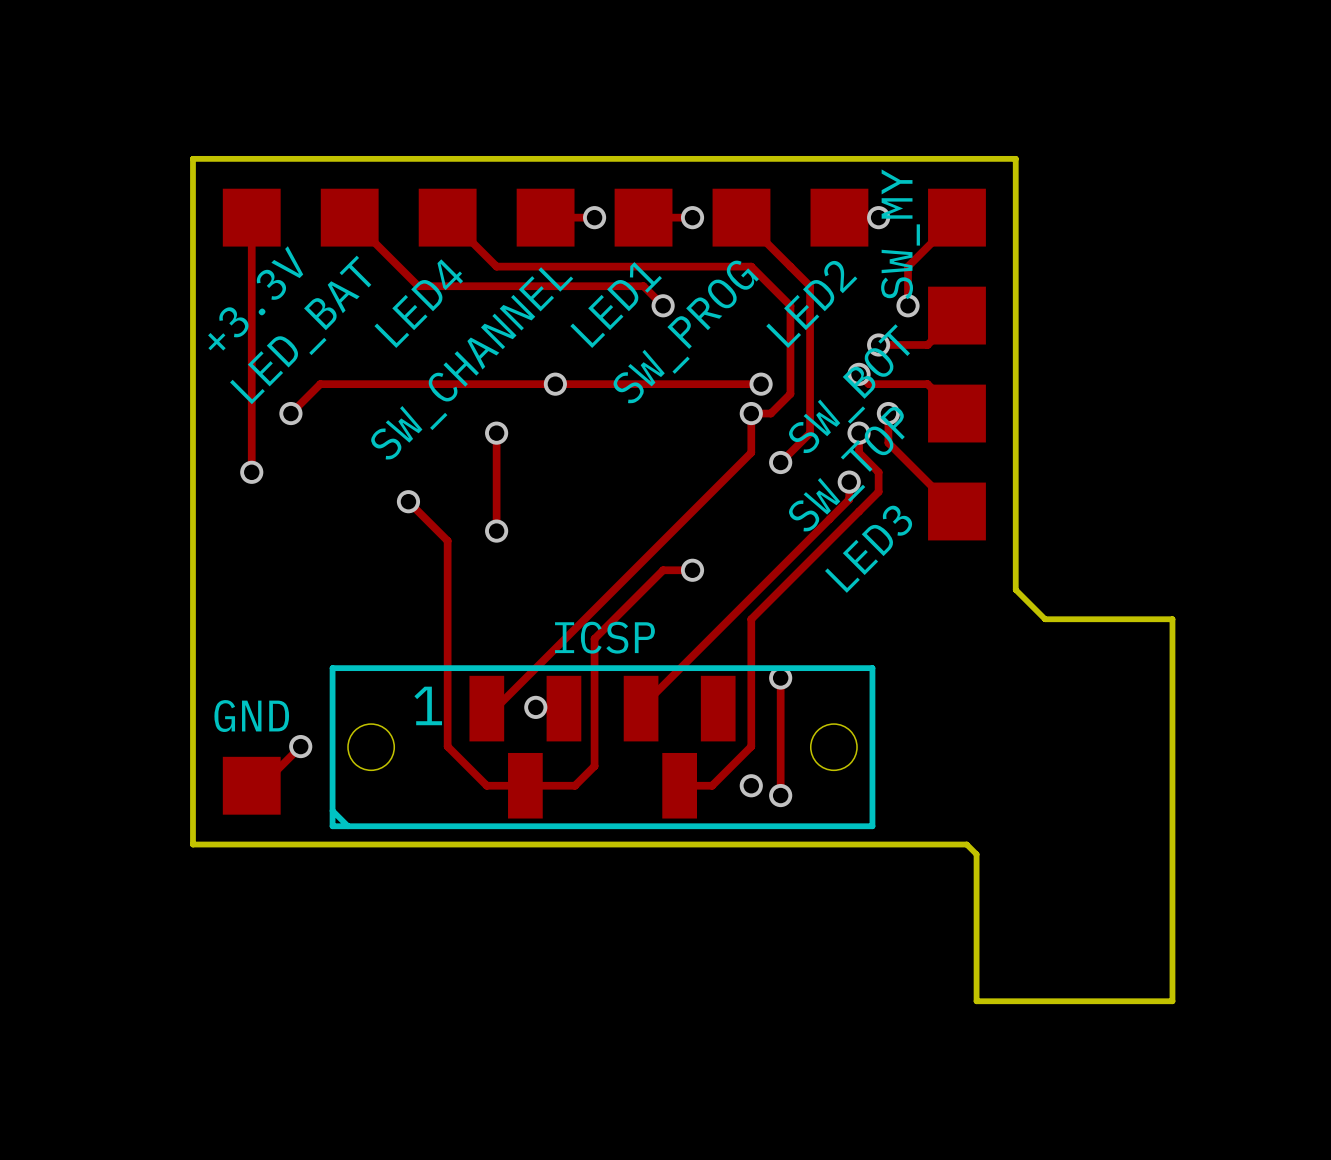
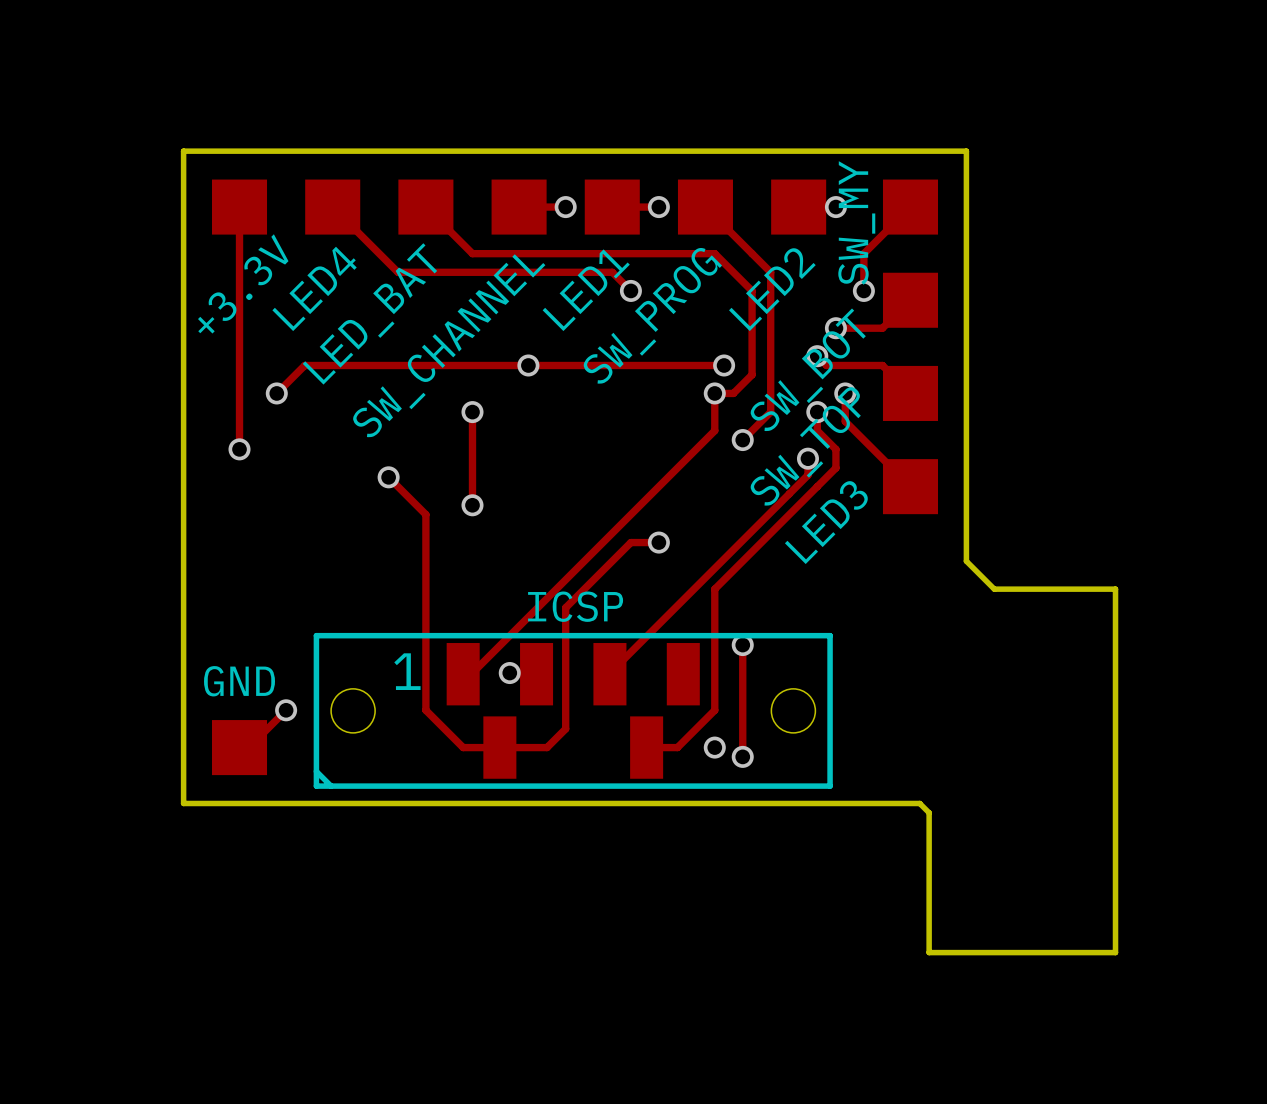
text: LED4 (418, 303) -> LED_BAT (369, 313)
text: LED_BAT (300, 329) -> LED4 (314, 288)

